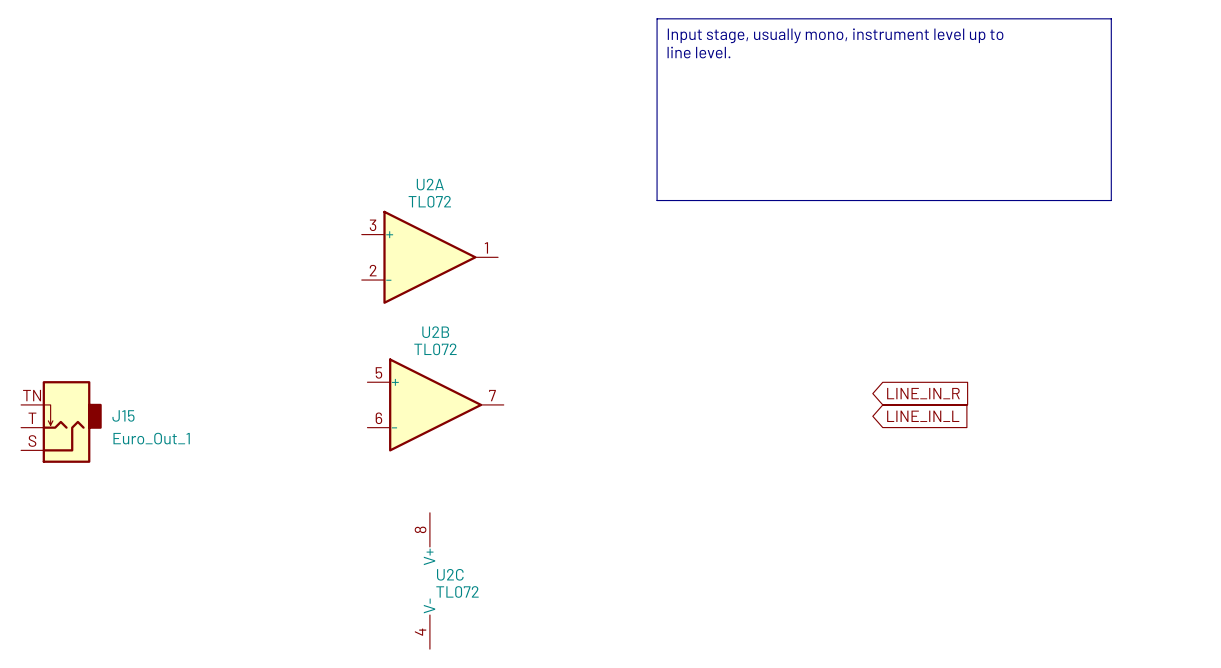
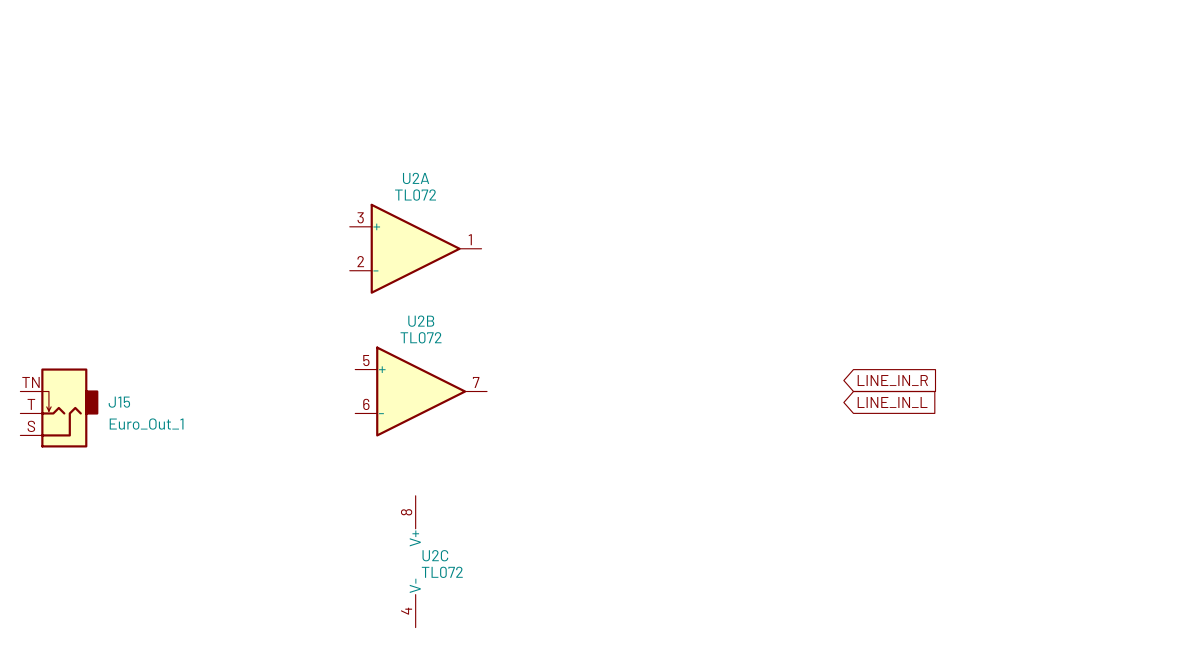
line: (657, 18) (1111, 18) (1111, 200) (657, 200) (657, 18) -> none
text: Input stage, usually mono, instrument level up to (835, 35) -> none
text: line level. (698, 52) -> none

